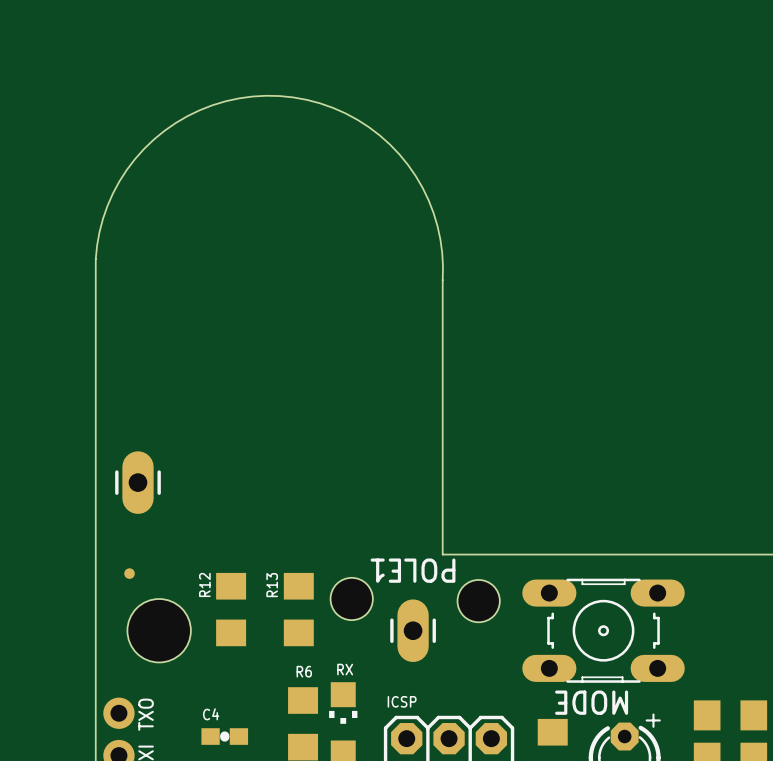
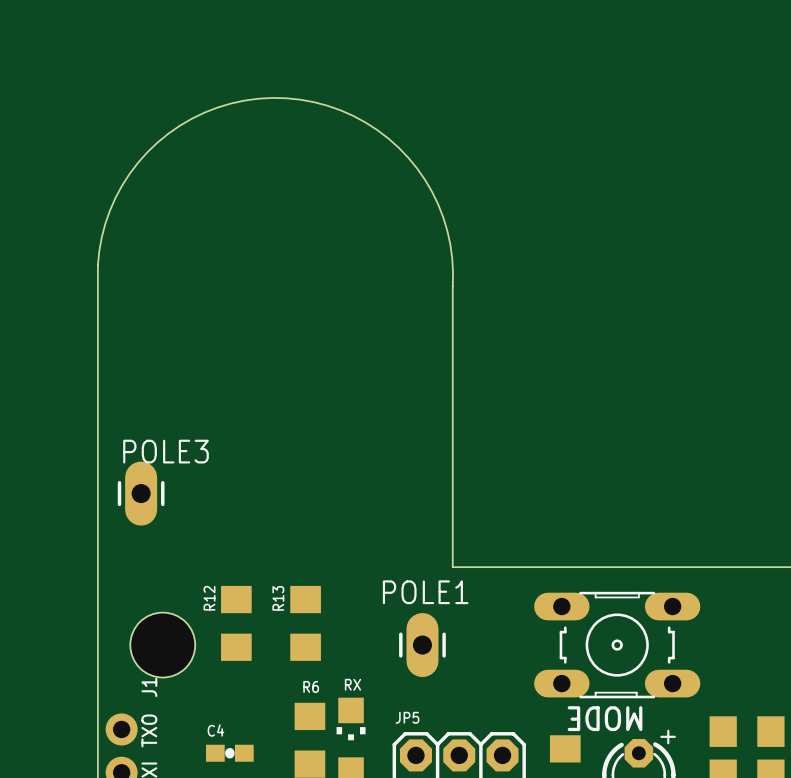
POLE3 name: none -> POLE3 (165, 451)
POLE1 name rotation: 0° (413, 570) -> 180° (425, 592)
part: (129, 573) -> none
hole: (351, 598) -> none
hole: (478, 601) -> none
text: none -> J1 (149, 687)
ICSP name: ICSP (402, 701) -> JP5 (407, 717)

